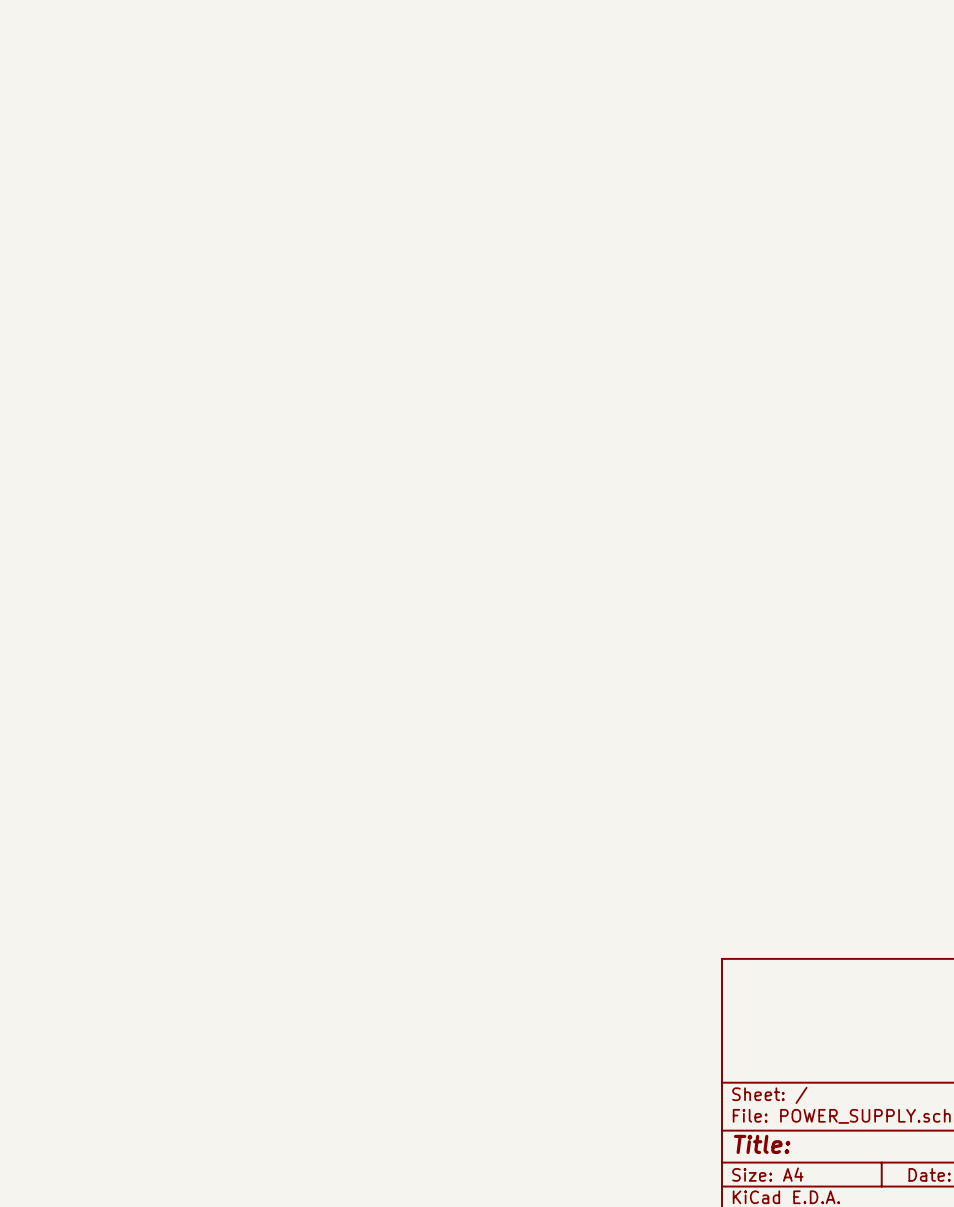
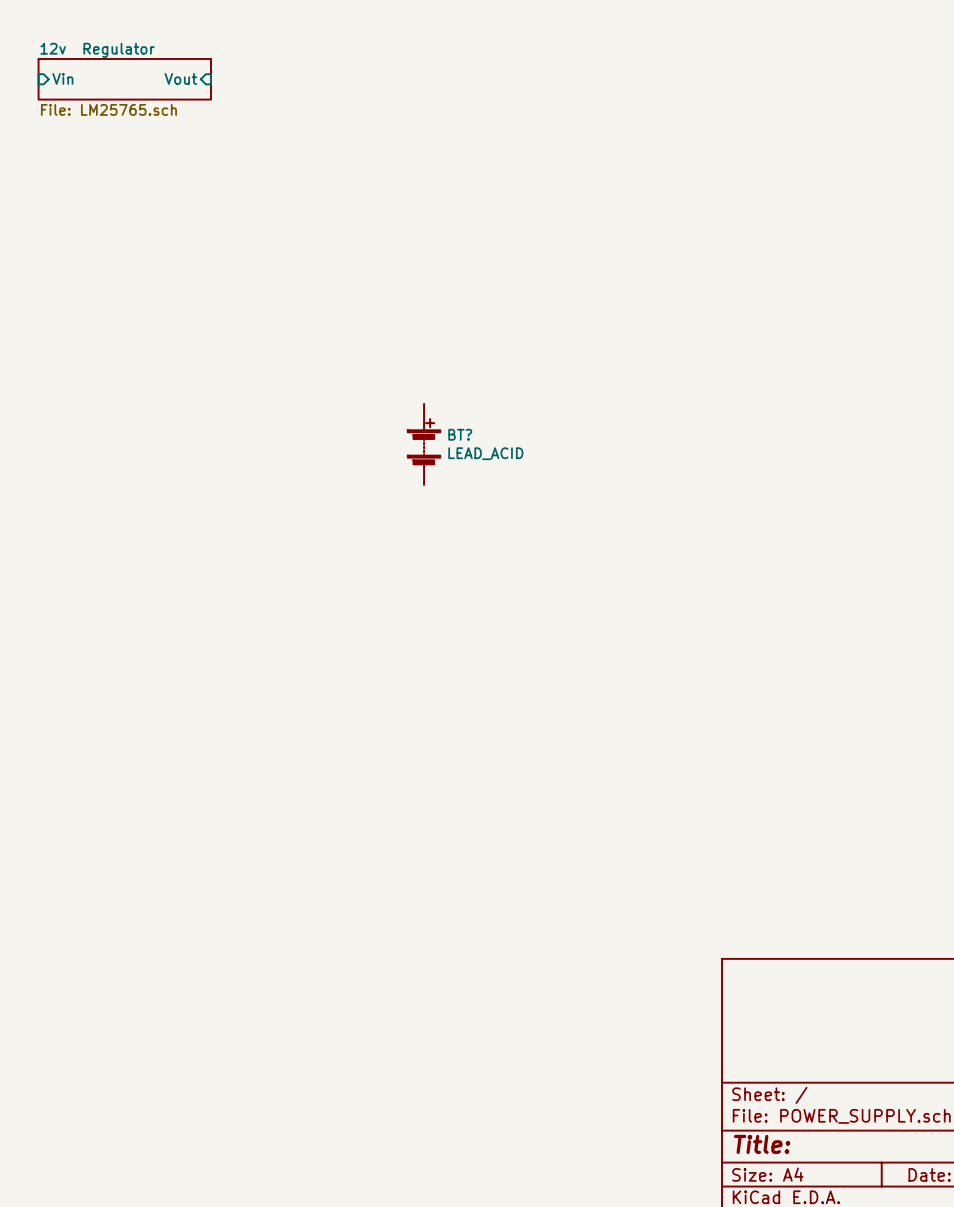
sheet pin: none -> Vin (62, 78)
sheet pin: none -> Vout (180, 78)
sheet 12v Regulator: none -> File: LM25765.sch (124, 79)
BT?: none -> LEAD_ACID (424, 444)

